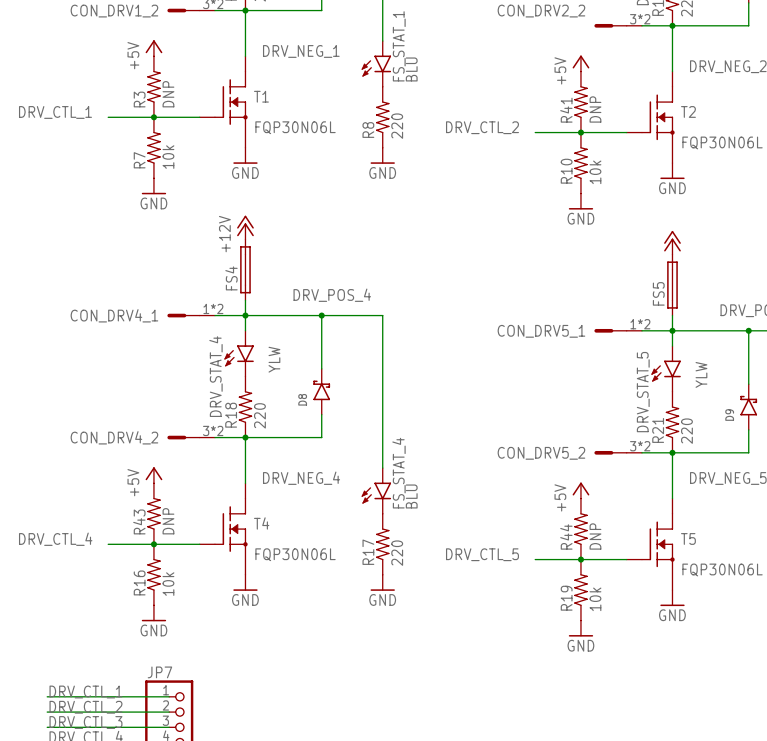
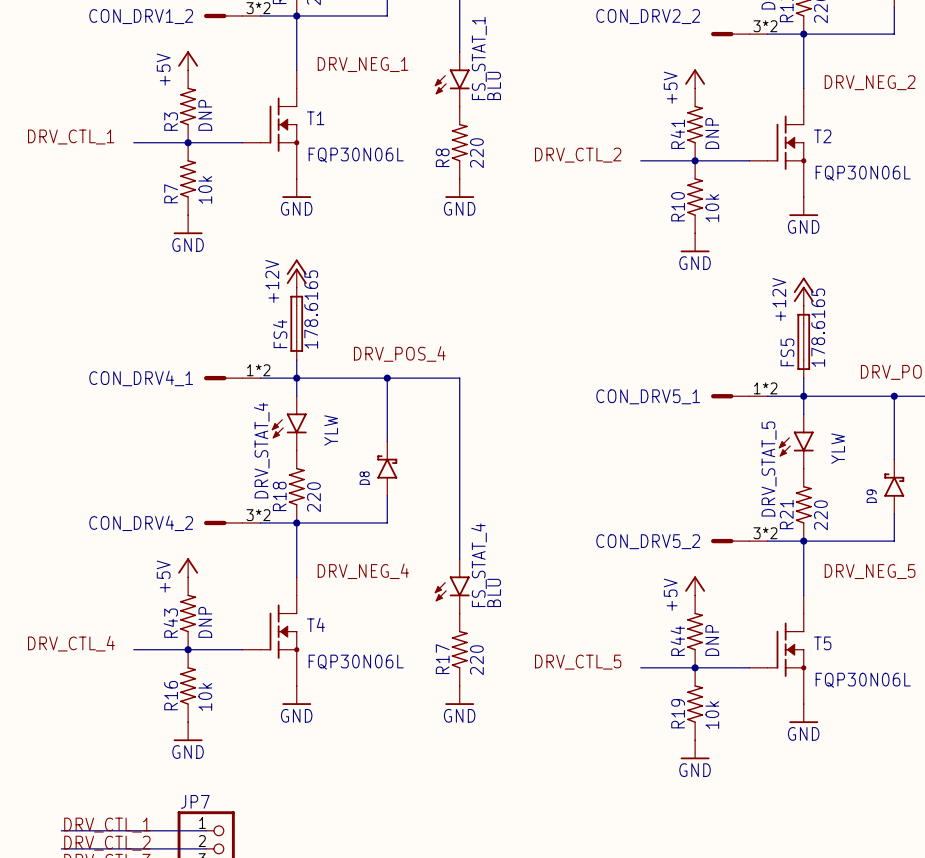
power symbol text: none -> +12V (779, 299)
FS4 value: none -> 178.6165 (311, 309)
FS5 value: none -> 178.6165 (818, 327)

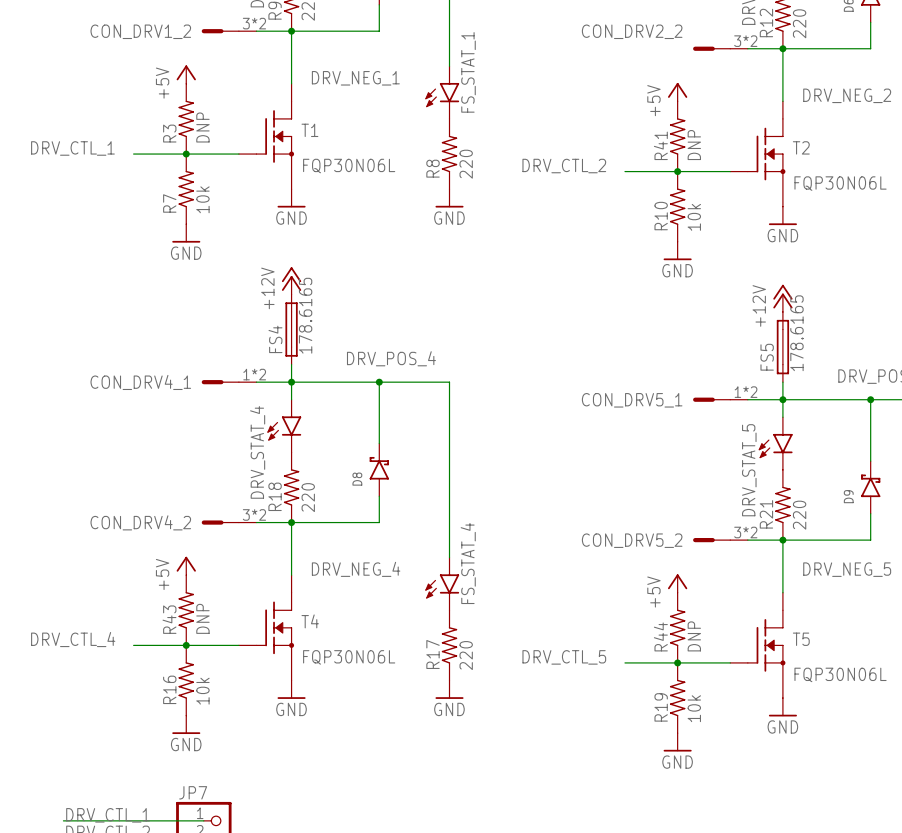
FS_STAT_1 value: BLU (494, 85) -> none
DRV_STAT_4 value: YLW (331, 430) -> none
DRV_STAT_5 value: YLW (838, 448) -> none
FS_STAT_4 value: BLU (494, 592) -> none

